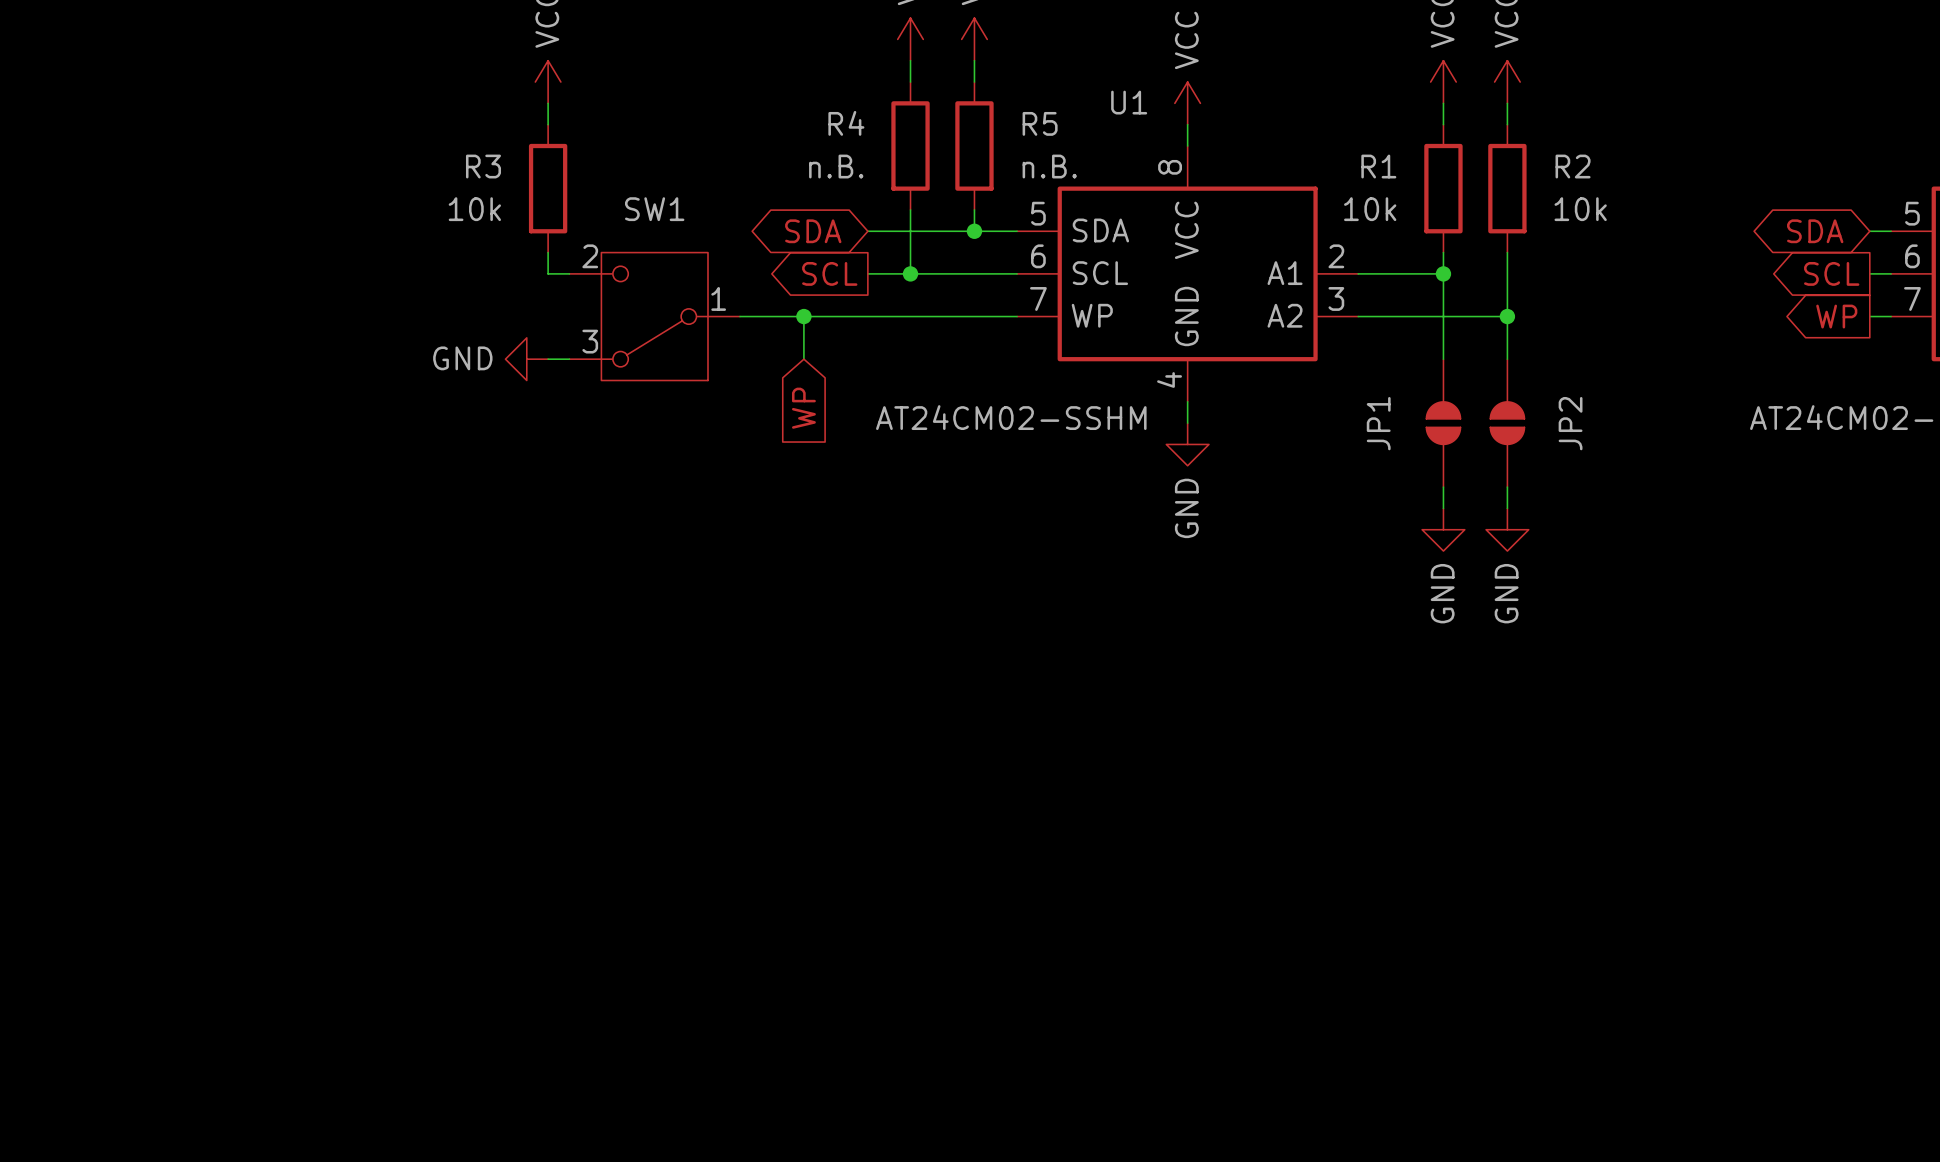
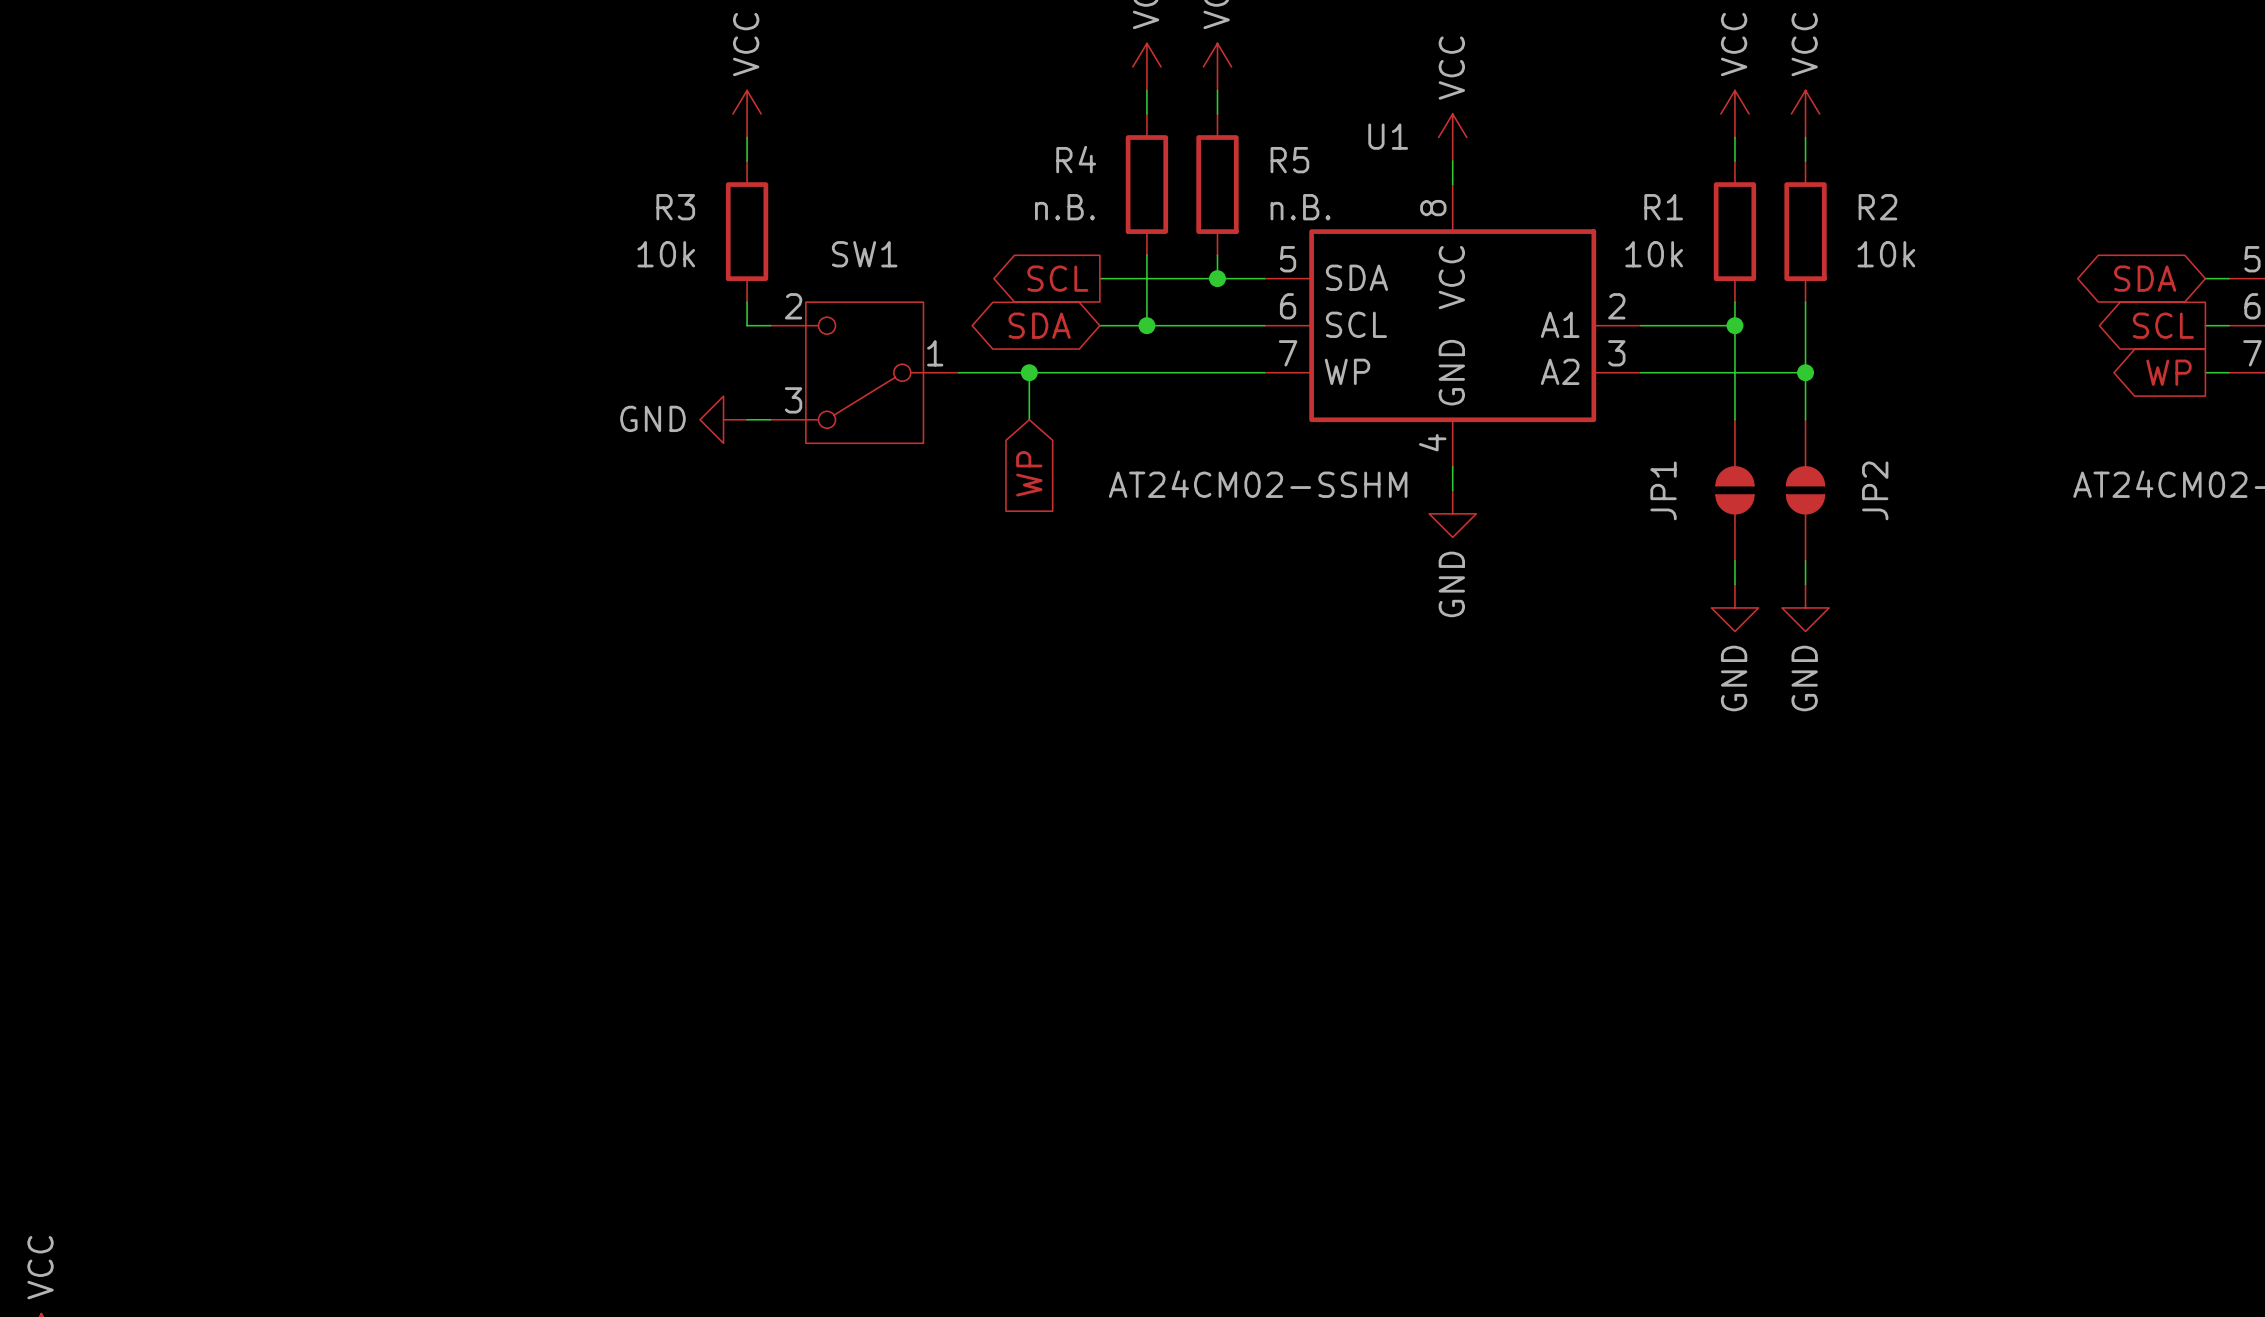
global label shape: bidirectional (813, 231) -> output (1057, 278)
global label: SDA (813, 231) -> SCL (1057, 278)
global label shape: output (829, 273) -> bidirectional (1039, 325)
global label: SCL (829, 273) -> SDA (1039, 325)

